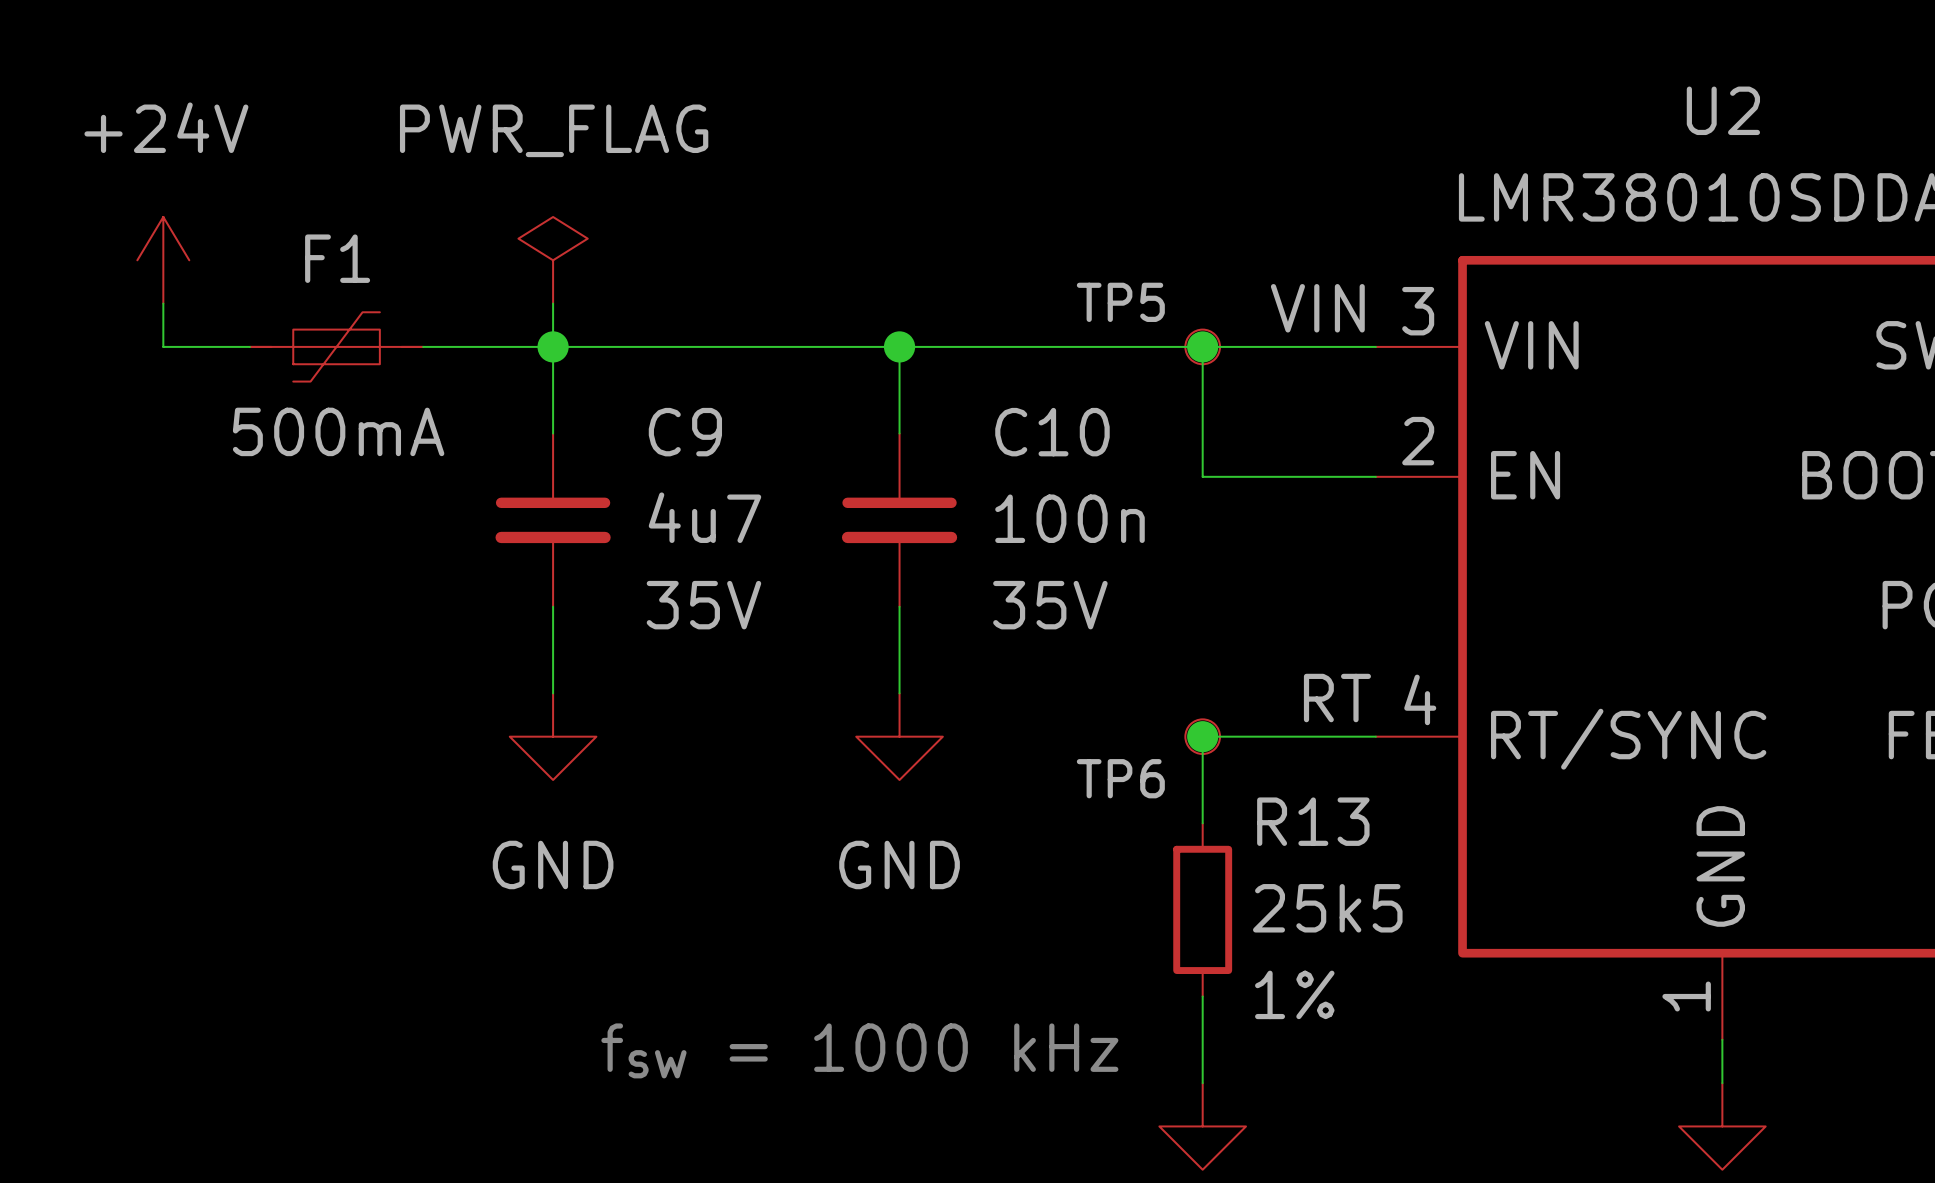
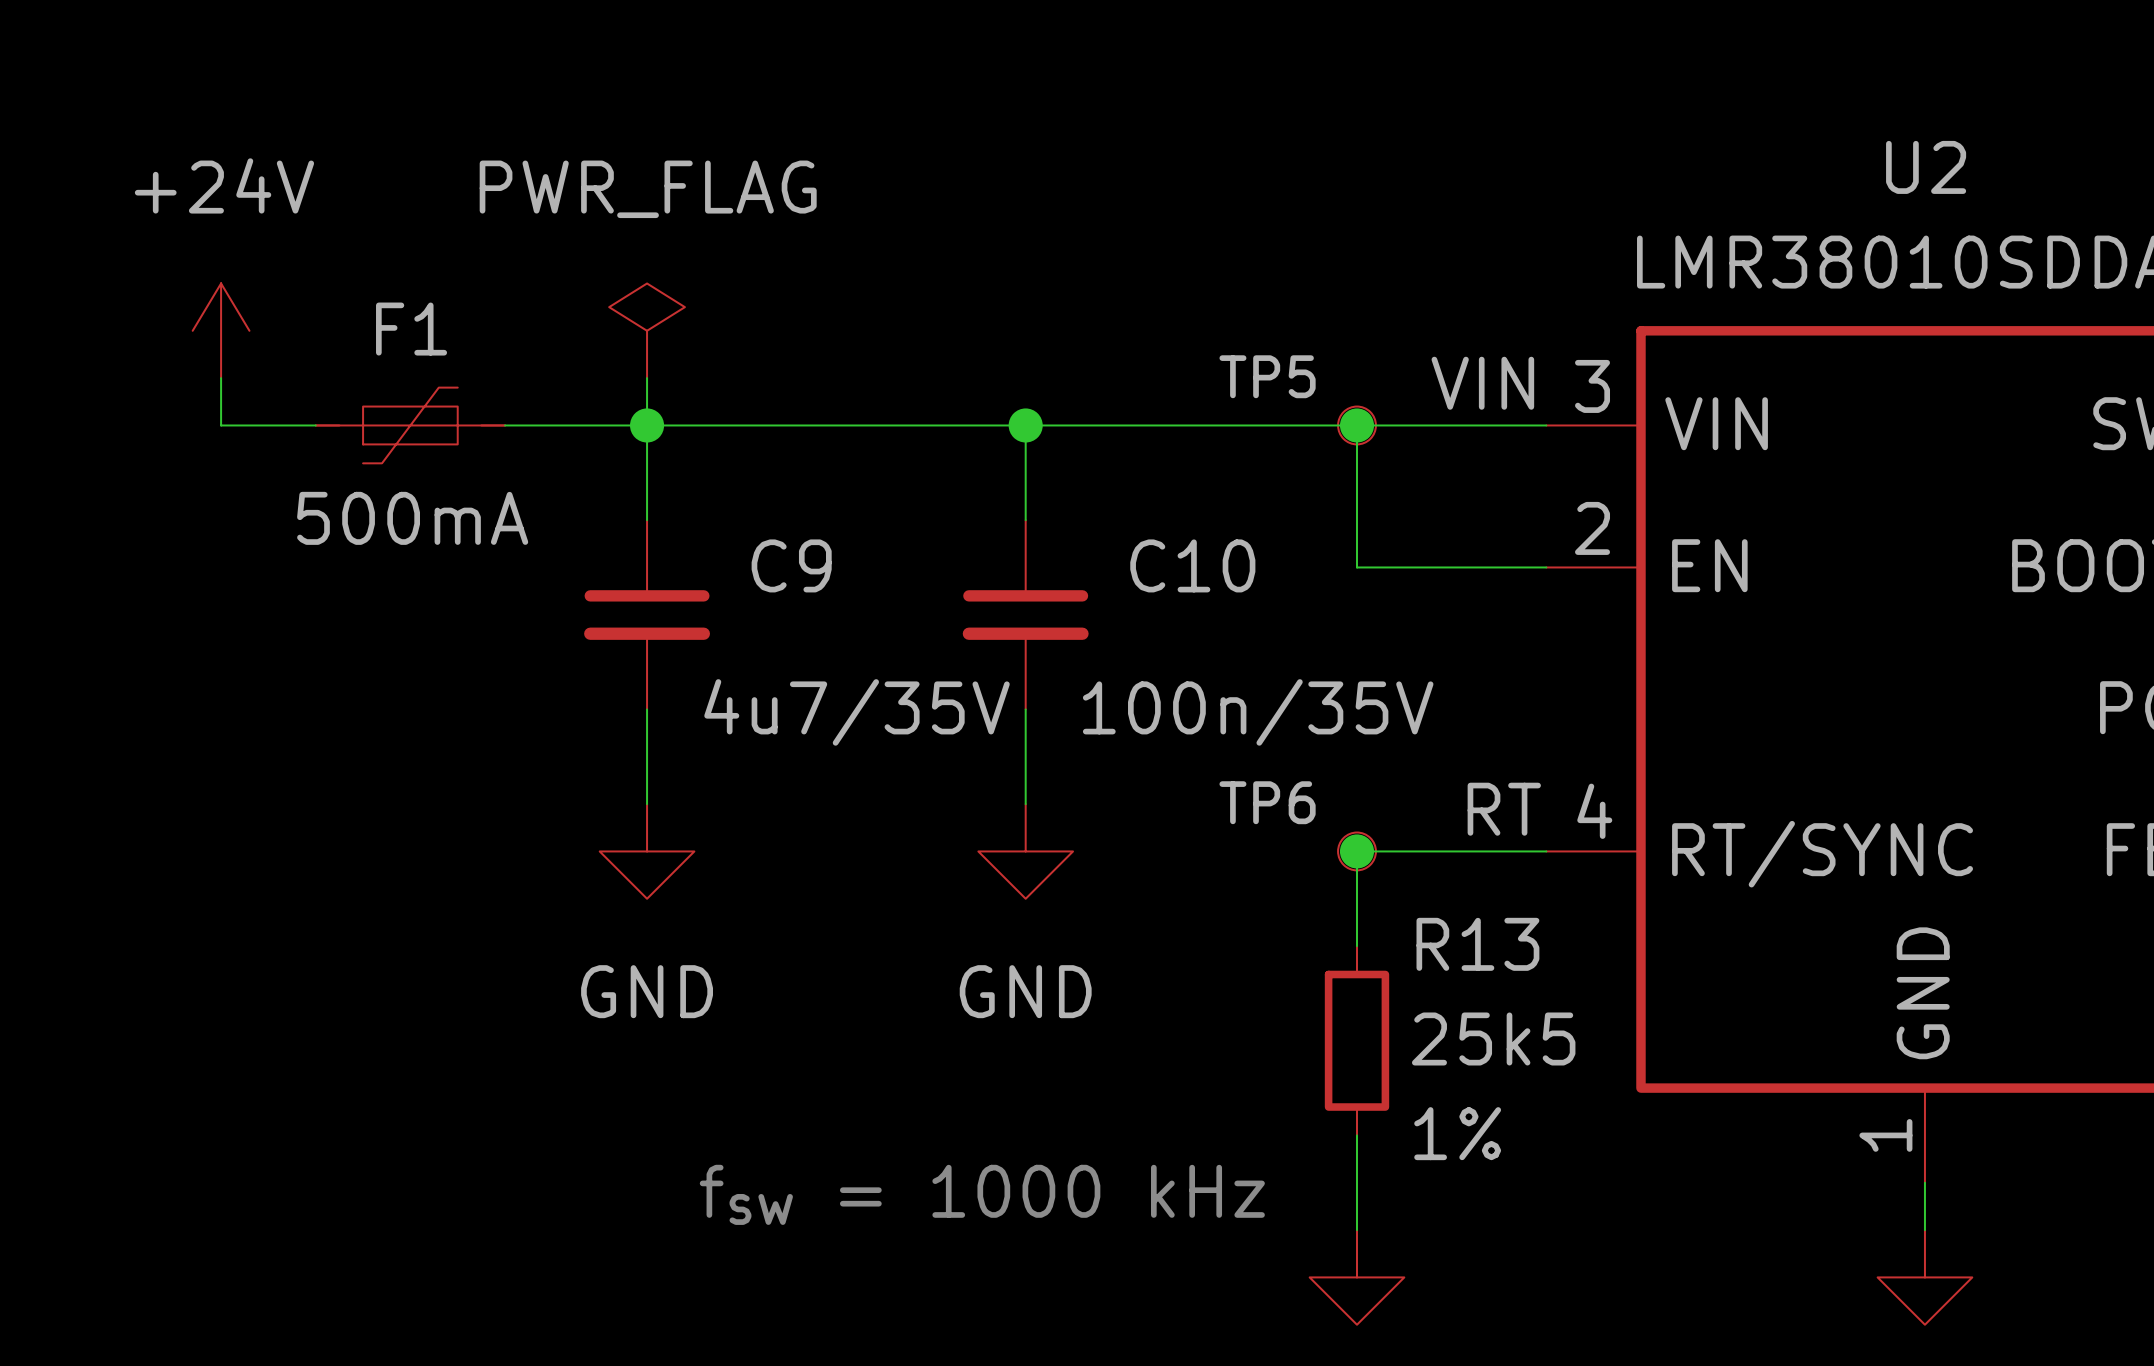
C9 name position: C9 (685, 432) -> C9 (791, 565)
C10 name position: C10 (1052, 432) -> C10 (1192, 565)
C9 value: 4u7 (704, 517) -> 4u7/35V (857, 712)
C10 value: 100n (1070, 518) -> 100n/35V (1258, 712)
C9 text: 35V (703, 605) -> none
C10 text: 35V (1050, 605) -> none
TP6 name position: TP6 (1120, 778) -> TP6 (1267, 802)

